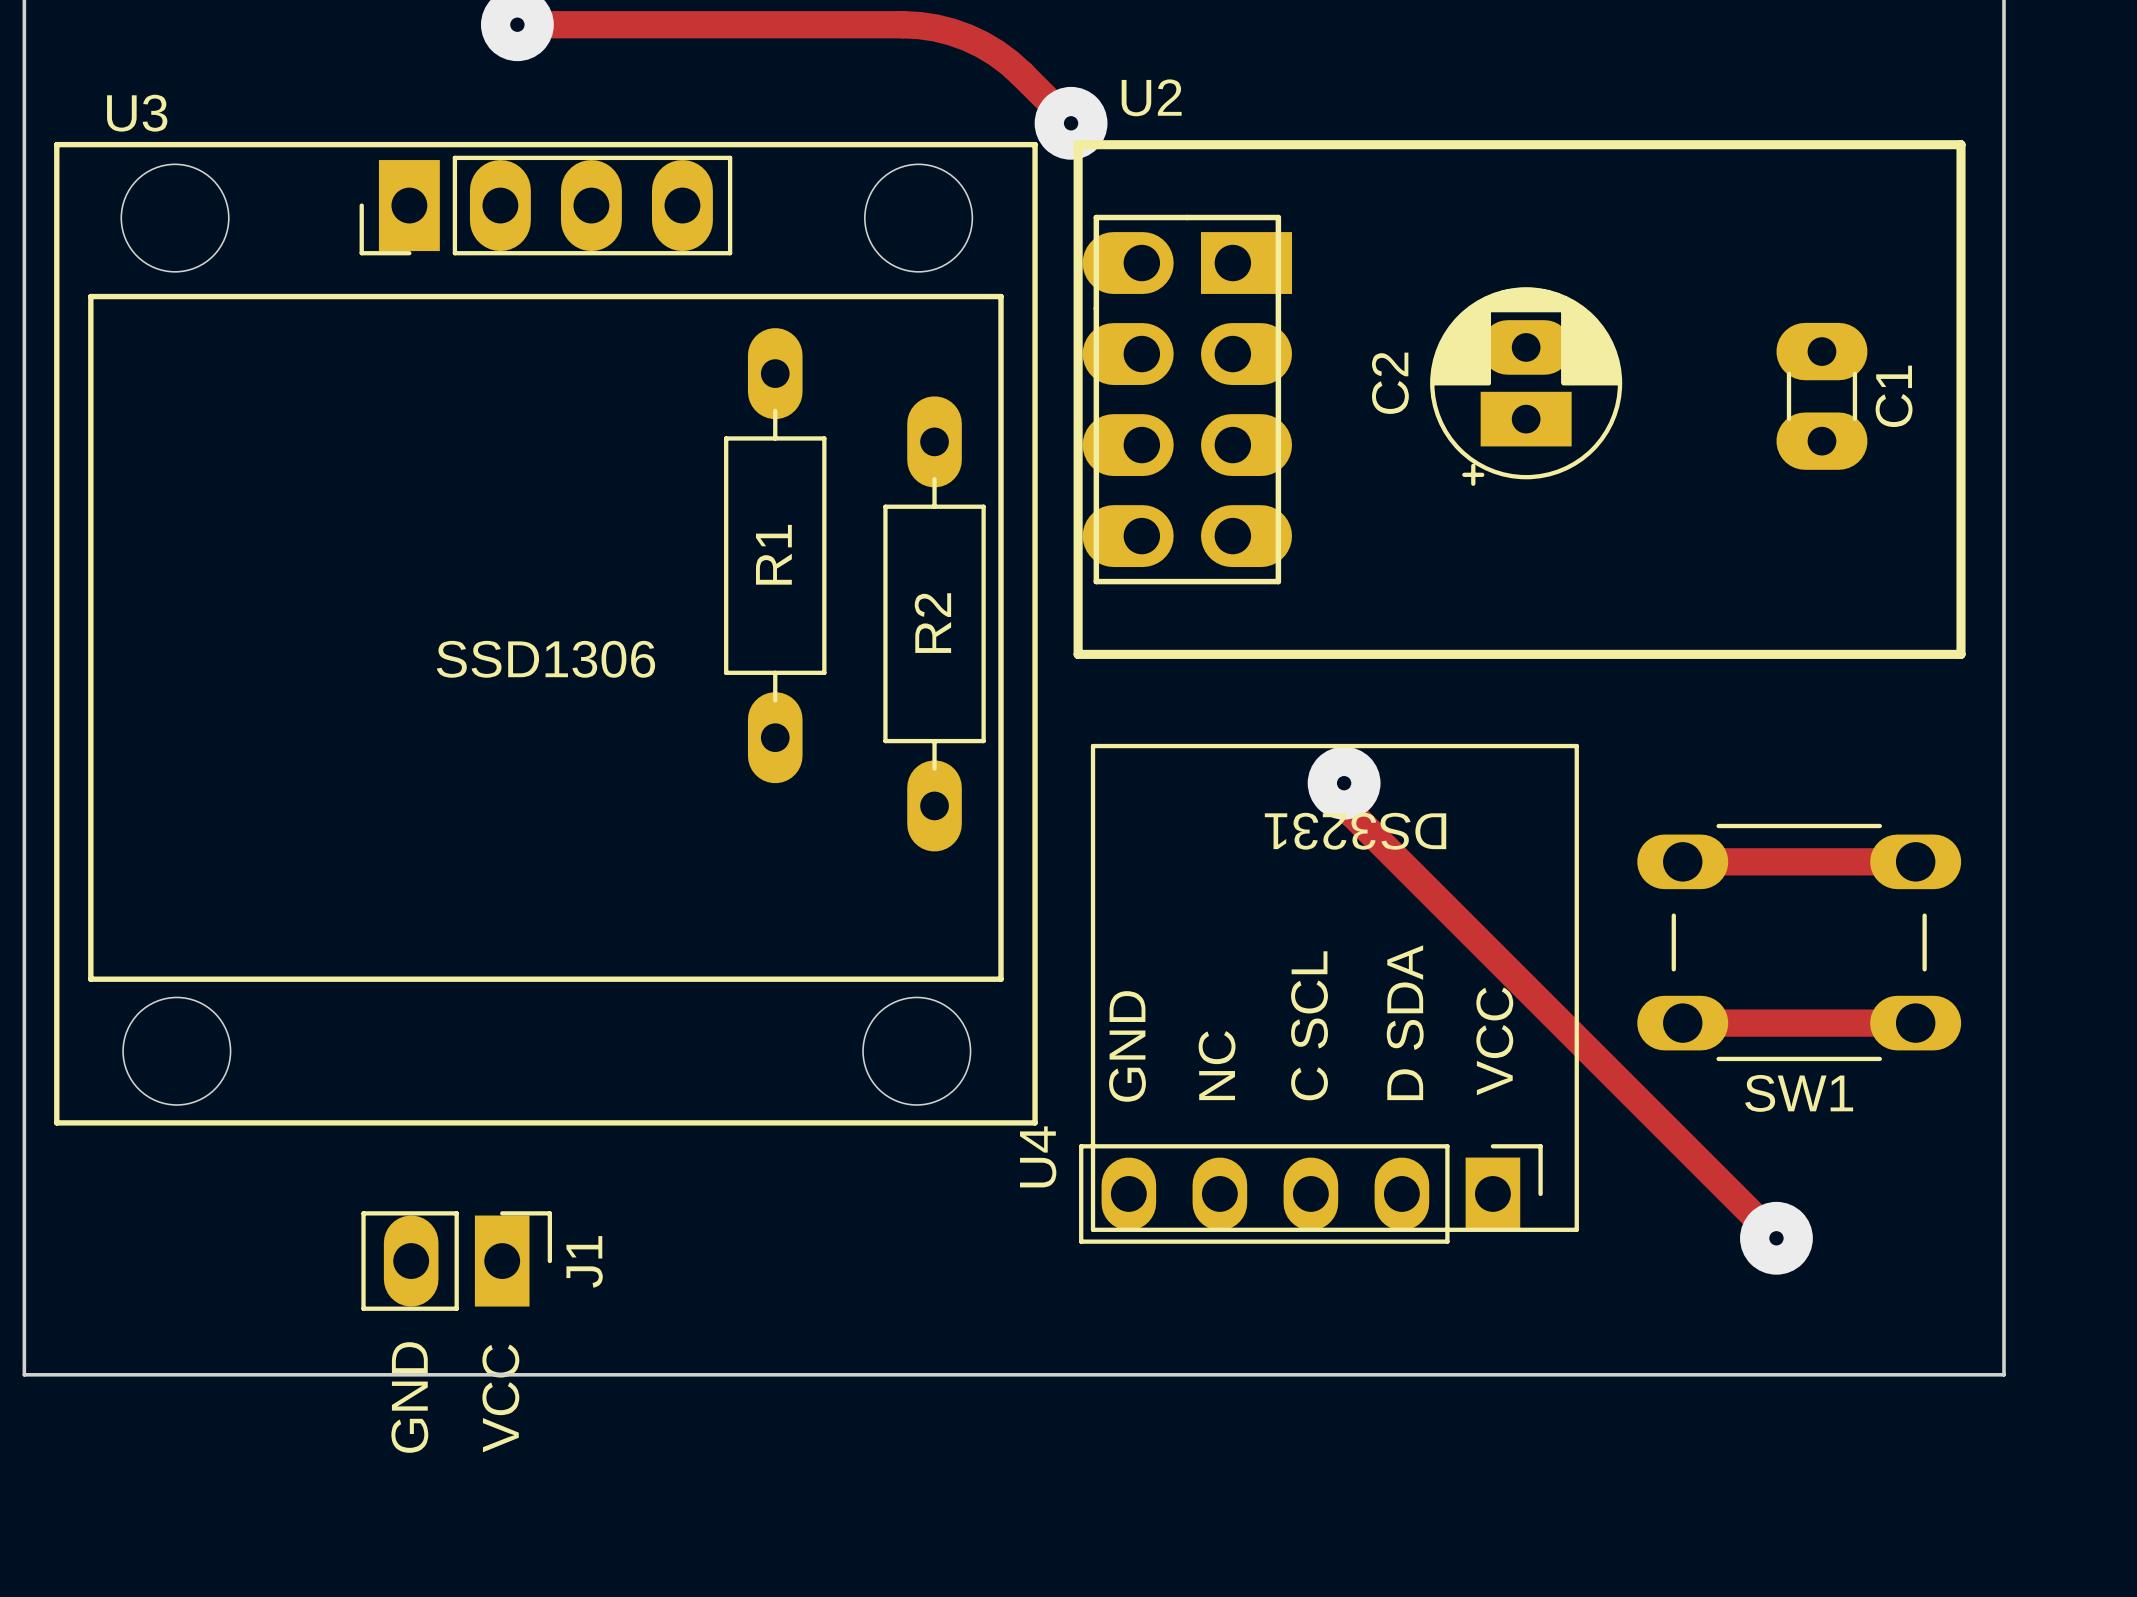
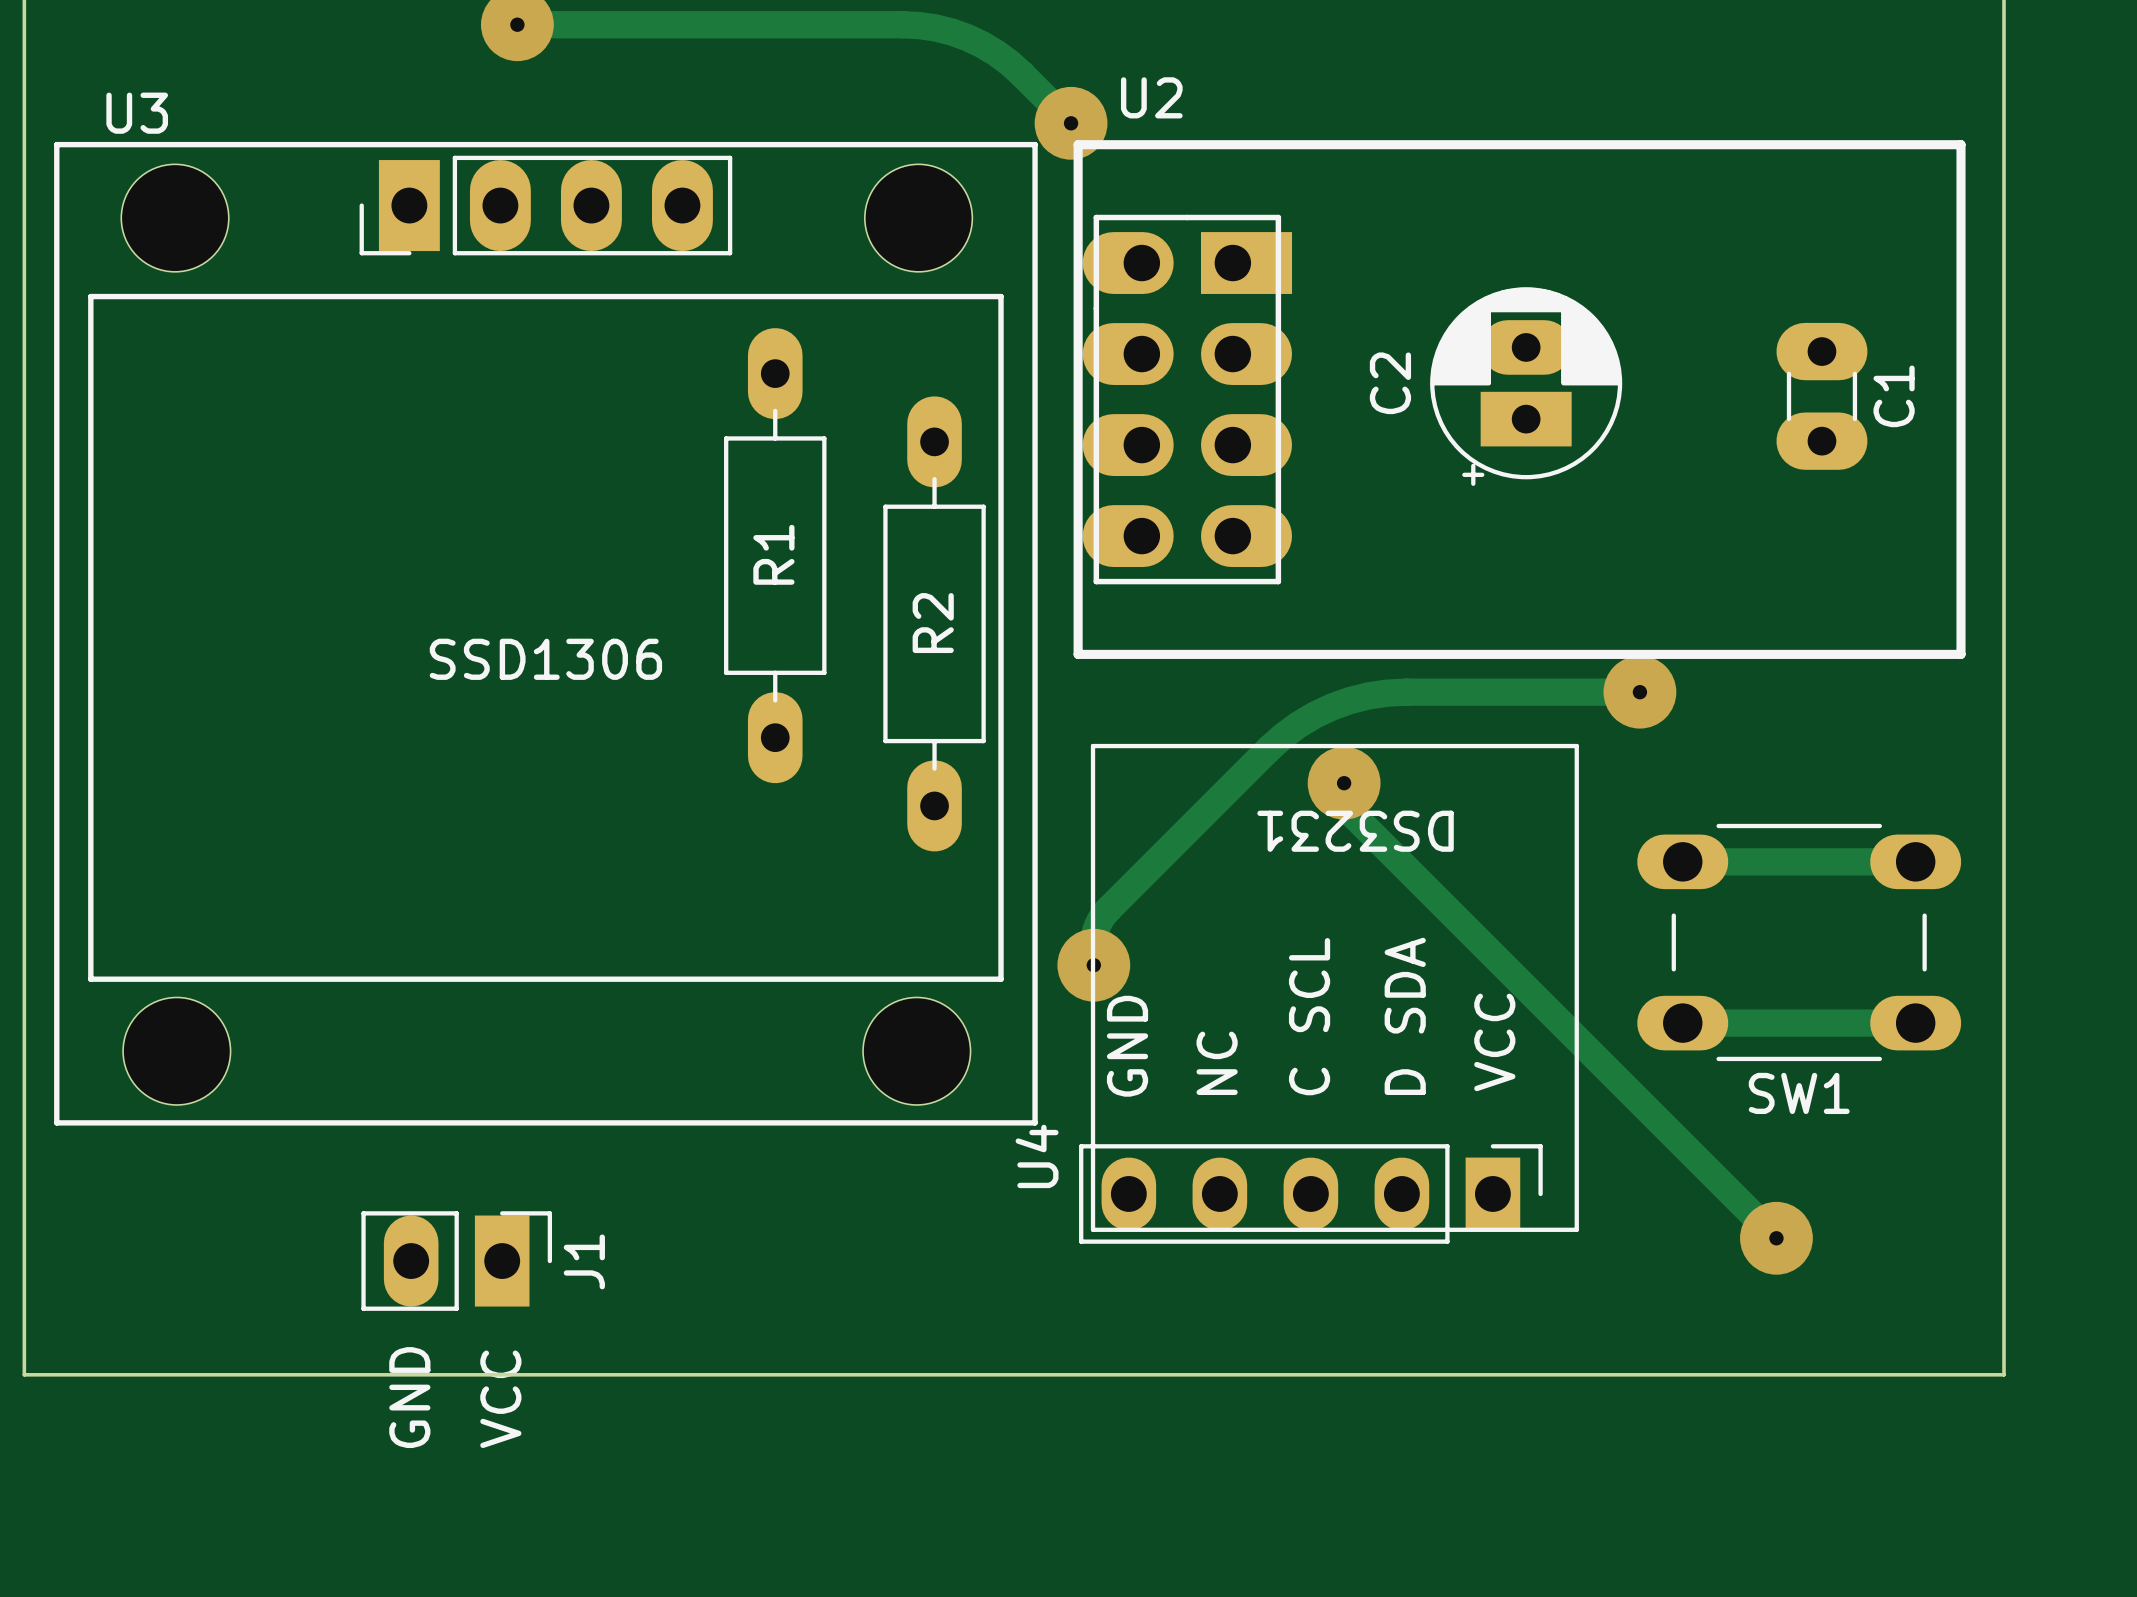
track: none -> (1639, 692) (1387, 693) (1349, 700) (1314, 715) (1282, 736) (1268, 749) (1105, 913) (1094, 934) (1093, 965)
via: none -> (1639, 692)
via: none -> (1093, 965)

